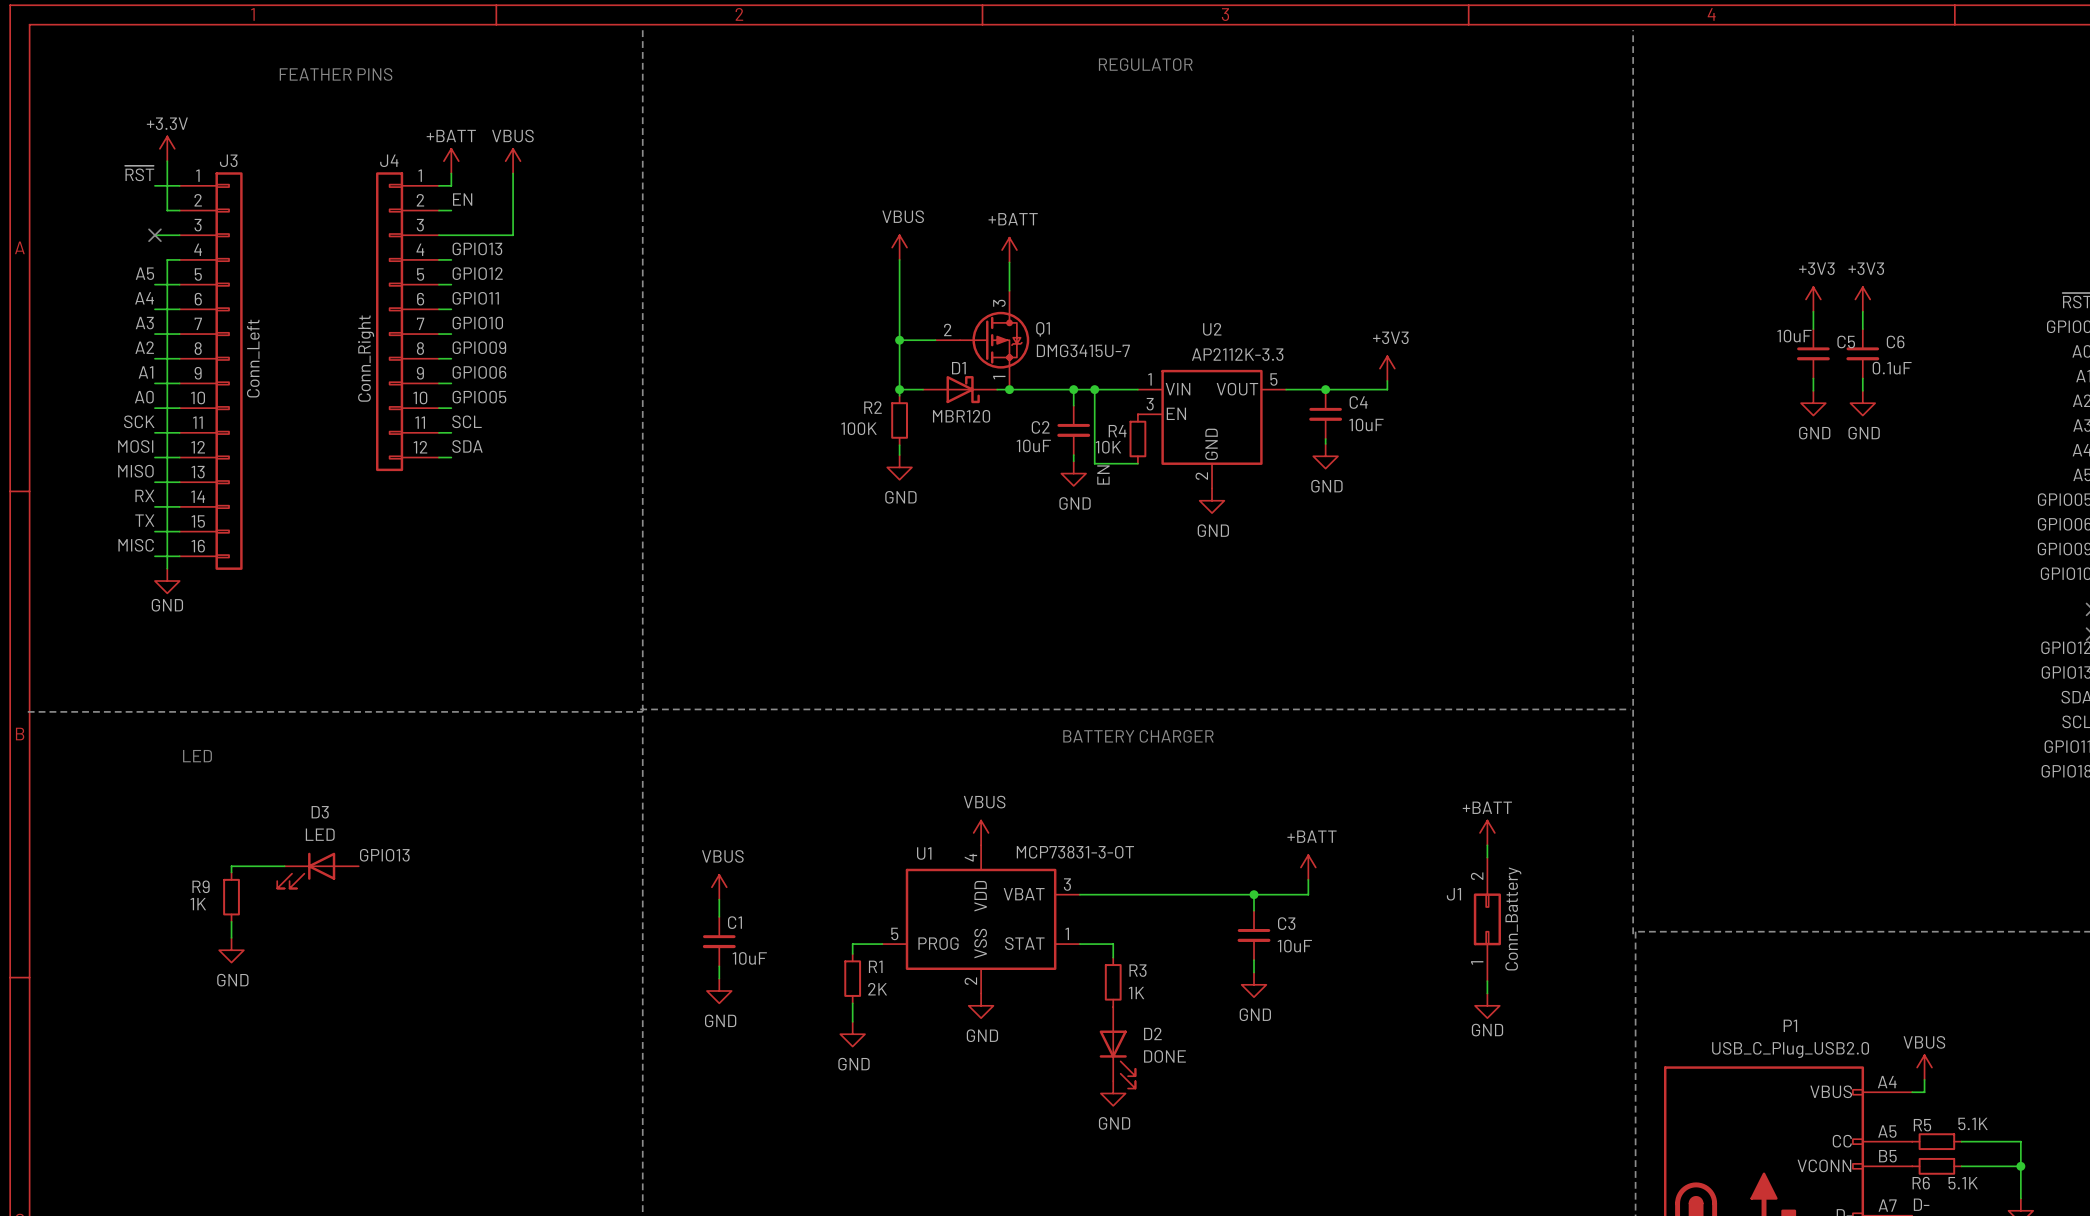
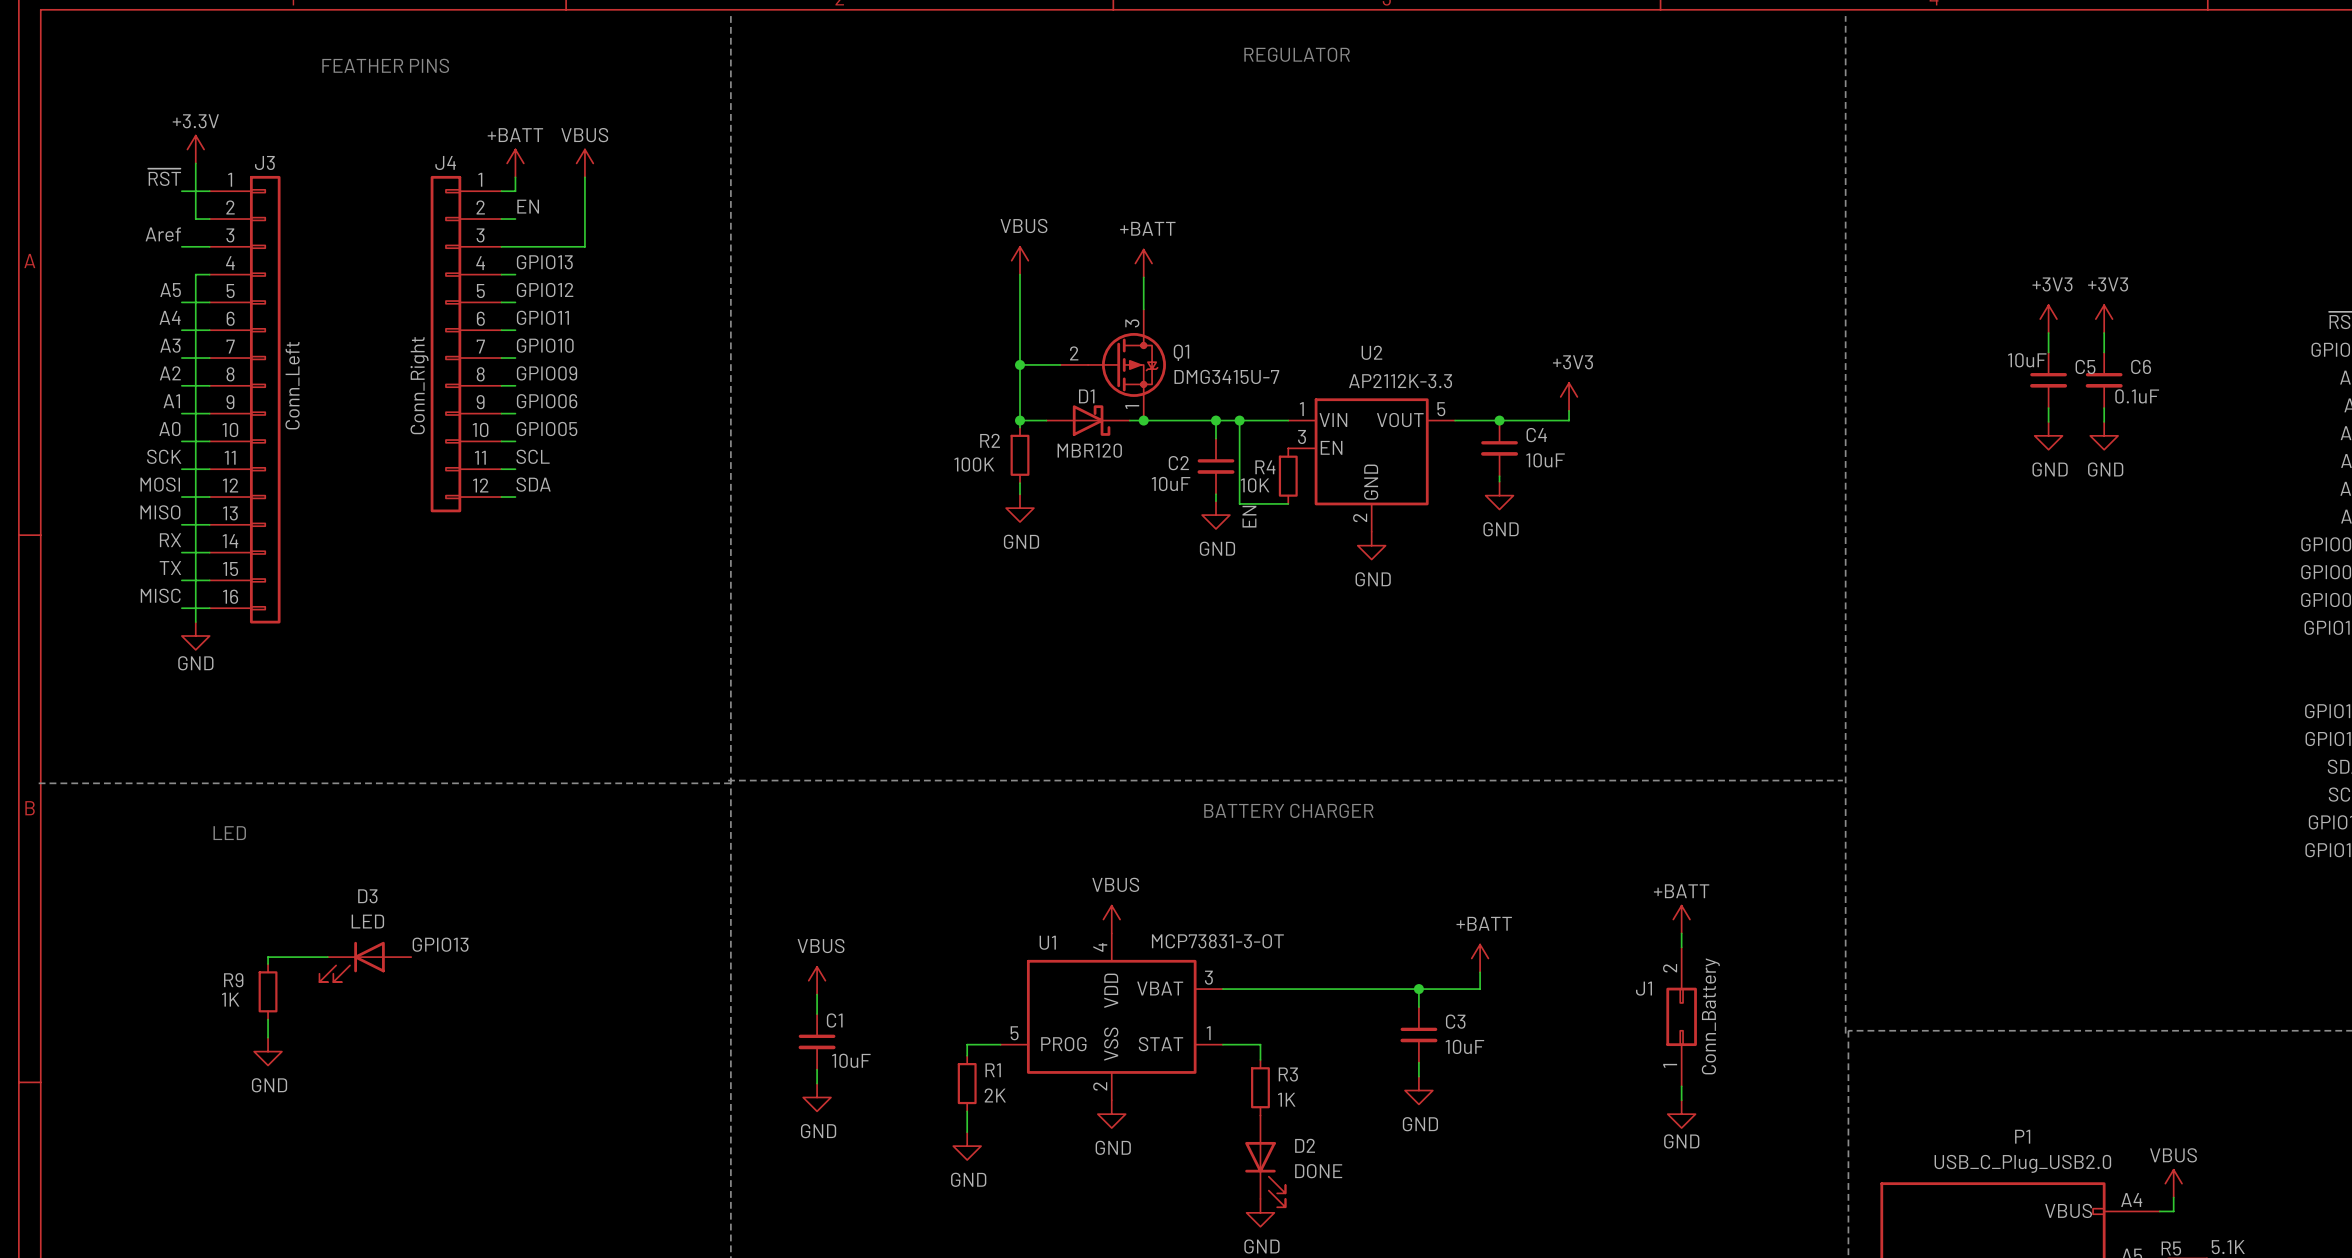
label: none -> Aref (163, 234)
no-connect mark: (154, 235) -> none

